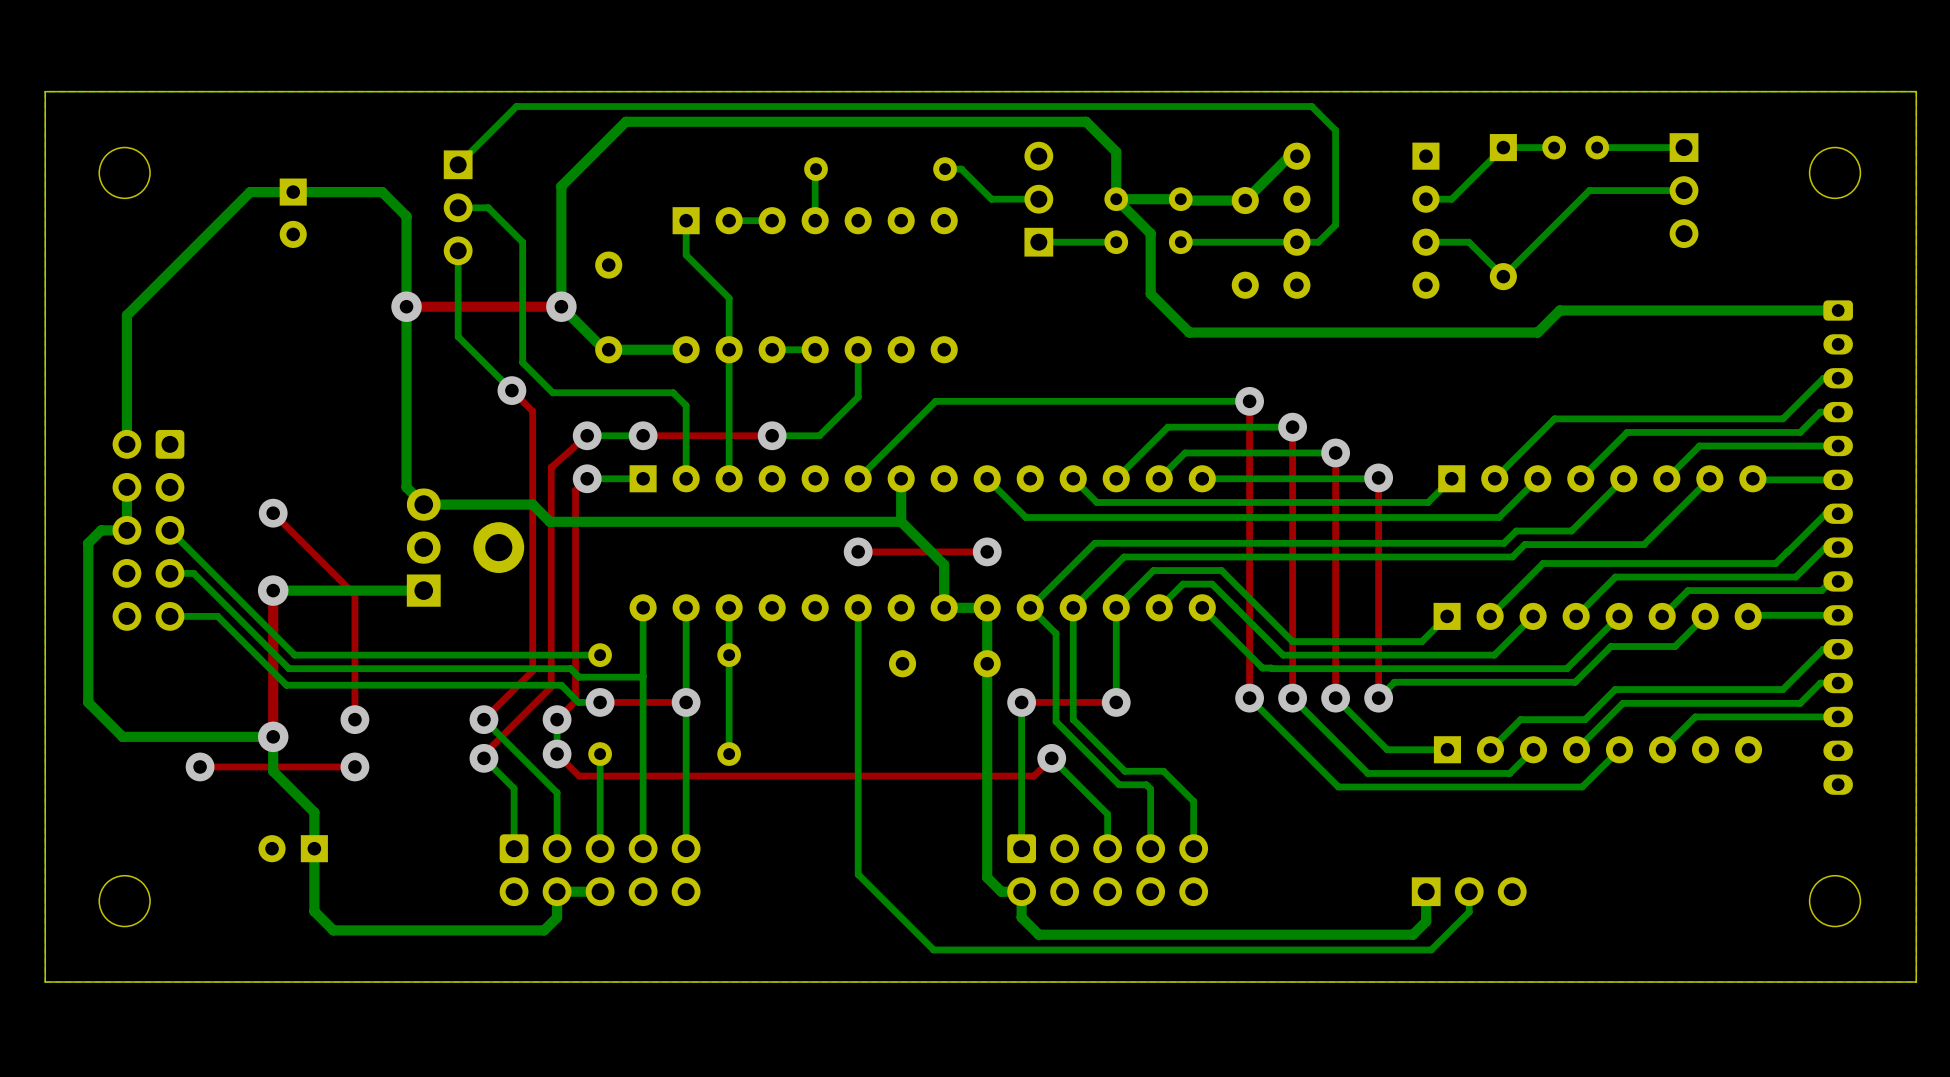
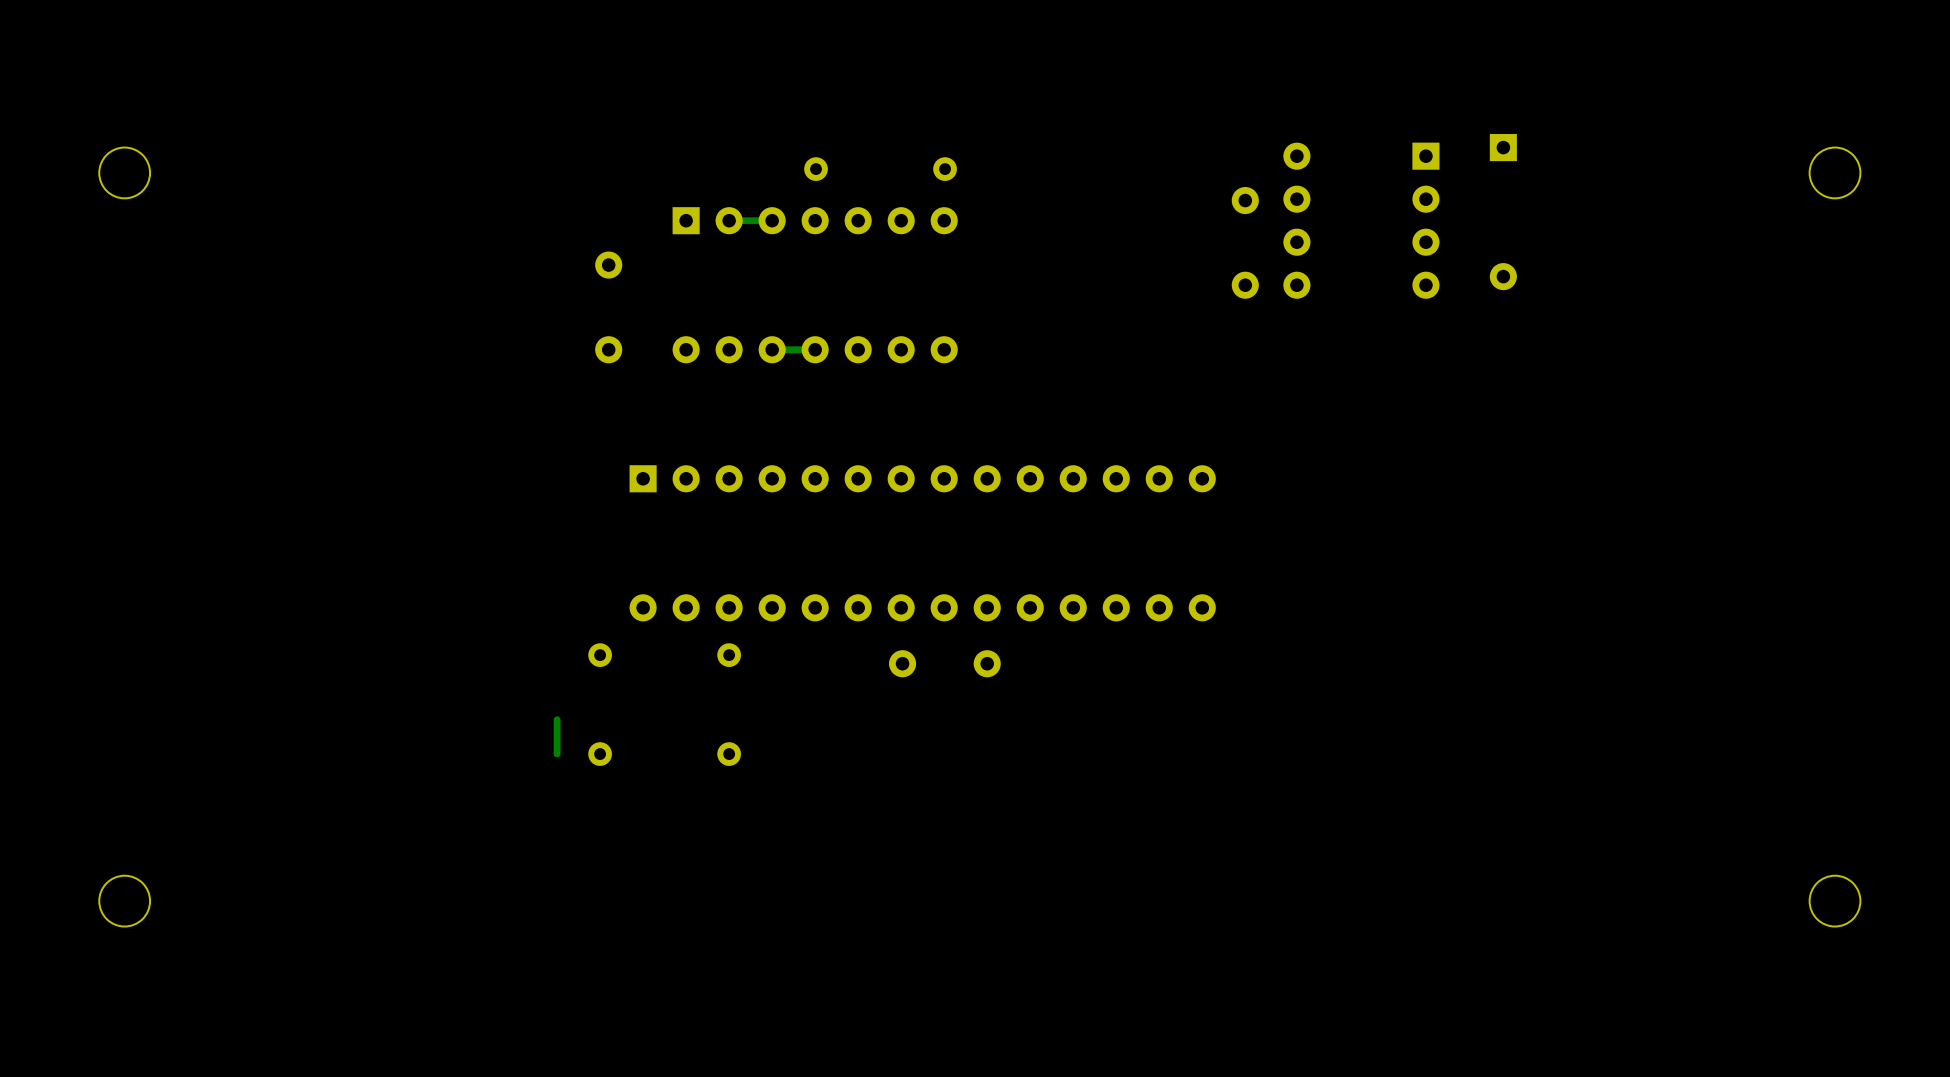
board edge: (1916, 91) (45, 91) (45, 982) (1916, 982) (1916, 91) -> none
bottom track: (1554, 147) (1503, 147) (1451, 199) (1425, 199) -> none
part: (1575, 147) -> none
bottom track: (1684, 147) (1597, 147) -> none
bottom track: (1289, 156) (1245, 200) (1182, 200) -> none
bottom track: (458, 164) (516, 106) (1311, 106) (1335, 130) (1335, 224) (1318, 242) (1180, 242) -> none
bottom track: (815, 169) (815, 220) -> none
bottom track: (945, 169) (961, 169) (991, 199) (1038, 199) -> none
bottom track: (1684, 190) (1589, 190) (1503, 276) (1468, 242) (1425, 242) -> none
part: (1684, 190) -> none
part: (1038, 199) -> none
bottom track: (1116, 199) (1116, 151) (1086, 121) (625, 121) (561, 186) (561, 306) (604, 349) -> none
bottom track: (1116, 199) (1150, 233) (1150, 293) (1189, 332) (1537, 332) (1559, 310) (1838, 310) -> none
bottom track: (1180, 199) (1116, 199) -> none
bottom track: (458, 207) (488, 207) (522, 242) (522, 362) (552, 392) (673, 392) (686, 405) (686, 478) -> none
part: (458, 207) -> none
part: (293, 213) -> none
bottom track: (686, 220) (686, 255) (729, 298) (729, 478) -> none
part: (1116, 220) -> none
part: (1180, 220) -> none
bottom track: (1116, 242) (1038, 242) -> none
bottom track: (458, 250) (458, 336) (511, 390) -> none
via: (406, 306) -> none
top track: (561, 306) (406, 306) -> none
via: (561, 306) -> none
bottom track: (686, 349) (608, 349) -> none
bottom track: (858, 349) (858, 397) (819, 435) (772, 435) -> none
bottom track: (1838, 378) (1823, 378) (1782, 418) (1554, 418) (1494, 478) -> none
top track: (511, 390) (532, 411) (532, 670) (483, 719) -> none
via: (511, 390) -> none
top track: (1249, 401) (1249, 698) -> none
bottom track: (1249, 401) (935, 401) (858, 478) -> none
via: (1249, 401) -> none
bottom track: (1838, 412) (1820, 412) (1800, 432) (1627, 432) (1580, 478) -> none
top track: (1292, 427) (1292, 698) -> none
bottom track: (1292, 427) (1167, 427) (1116, 478) -> none
via: (1292, 427) -> none
top track: (587, 435) (551, 467) (551, 687) (483, 754) (483, 758) -> none
via: (587, 435) -> none
bottom track: (643, 435) (587, 435) -> none
via: (643, 435) -> none
top track: (772, 435) (643, 435) -> none
via: (772, 435) -> none
bottom track: (126, 444) (126, 315) (250, 192) (382, 192) (406, 216) (406, 487) (423, 504) (532, 504) (549, 521) (901, 521) -> none
bottom track: (1838, 445) (1699, 445) (1666, 478) -> none
top track: (1335, 452) (1335, 698) -> none
bottom track: (1335, 452) (1185, 452) (1159, 478) -> none
via: (1335, 452) -> none
top track: (1378, 477) (1378, 698) -> none
bottom track: (1378, 477) (1202, 478) -> none
via: (1378, 477) -> none
top track: (587, 478) (575, 490) (575, 701) (557, 719) -> none
via: (587, 478) -> none
bottom track: (643, 478) (587, 478) -> none
bottom track: (901, 478) (901, 521) -> none
bottom track: (1451, 478) (1428, 502) (1096, 502) (1073, 478) -> none
bottom track: (1537, 478) (1499, 517) (1025, 517) (987, 478) -> none
part: (1602, 478) -> none
bottom track: (1623, 478) (1571, 531) (1516, 531) (1504, 543) (1094, 543) (1030, 607) (1056, 633) (1056, 721) (1119, 784) (1146, 784) (1150, 789) (1150, 848) -> none
bottom track: (1709, 478) (1644, 544) (1524, 544) (1512, 557) (1124, 557) (1073, 607) (1073, 719) (1124, 771) (1163, 771) (1193, 801) (1193, 848) -> none
bottom track: (1838, 479) (1753, 479) -> none
bottom track: (126, 487) (126, 530) (101, 530) (88, 543) (88, 702) (122, 736) (273, 736) (273, 771) (314, 812) (314, 911) (333, 930) (544, 930) (557, 917) (557, 891) (600, 891) -> none
top track: (273, 513) (354, 594) (354, 719) -> none
via: (273, 513) -> none
bottom track: (1838, 513) (1825, 513) (1775, 563) (1543, 563) (1490, 616) -> none
bottom track: (901, 521) (944, 564) (944, 607) (987, 607) (987, 877) (1001, 891) (1021, 891) (1021, 917) (1038, 934) (1413, 934) (1426, 921) (1426, 891) -> none
part: (148, 530) -> none
bottom track: (169, 530) (294, 655) (600, 655) -> none
part: (423, 547) -> none
part: (498, 547) -> none
bottom track: (1838, 547) (1825, 547) (1795, 577) (1615, 577) (1576, 616) -> none
part: (1838, 547) -> none
via: (858, 551) -> none
top track: (987, 551) (858, 551) -> none
via: (987, 551) -> none
bottom track: (169, 573) (193, 573) (289, 668) (570, 668) (579, 677) (643, 676) -> none
bottom track: (1830, 581) (1821, 590) (1687, 590) (1662, 616) -> none
top track: (273, 590) (273, 732) -> none
via: (273, 590) -> none
bottom track: (423, 590) (273, 590) (275, 593) -> none
bottom track: (643, 607) (643, 848) -> none
bottom track: (686, 607) (686, 848) -> none
bottom track: (729, 607) (729, 754) -> none
bottom track: (858, 607) (858, 874) (933, 949) (1431, 949) (1469, 912) (1469, 891) -> none
bottom track: (1159, 607) (1182, 584) (1212, 584) (1283, 655) (1494, 655) (1533, 616) -> none
bottom track: (1202, 607) (1262, 668) (1271, 668) (1566, 668) (1619, 616) -> none
bottom track: (1838, 615) (1749, 615) -> none
bottom track: (169, 616) (217, 616) (286, 685) (561, 685) (578, 702) (600, 702) -> none
bottom track: (1447, 616) (1421, 641) (1292, 641) (1221, 570) (1153, 570) (1116, 607) (1116, 702) -> none
part: (1597, 616) -> none
bottom track: (1705, 616) (1675, 646) (1610, 646) (1575, 682) (1394, 682) (1378, 698) -> none
bottom track: (1838, 649) (1823, 649) (1782, 689) (1615, 689) (1585, 719) (1520, 719) (1490, 749) -> none
bottom track: (1838, 683) (1820, 683) (1800, 703) (1622, 703) (1576, 749) -> none
bottom track: (1249, 698) (1338, 787) (1582, 787) (1619, 749) -> none
via: (1249, 698) -> none
bottom track: (1292, 698) (1367, 773) (1509, 773) (1533, 749) -> none
via: (1292, 698) -> none
bottom track: (1335, 698) (1387, 749) (1447, 749) -> none
via: (1335, 698) -> none
via: (1378, 698) -> none
via: (600, 702) -> none
top track: (686, 702) (600, 702) -> none
via: (686, 702) -> none
bottom track: (1021, 702) (1021, 848) -> none
via: (1021, 702) -> none
top track: (1116, 702) (1021, 702) -> none
via: (1116, 702) -> none
bottom track: (1838, 716) (1695, 716) (1662, 749) -> none
via: (354, 719) -> none
bottom track: (483, 719) (557, 792) (557, 848) -> none
via: (483, 719) -> none
via: (557, 719) -> none
via: (273, 736) -> none
part: (1598, 749) -> none
top track: (557, 754) (579, 776) (1034, 776) (1051, 758) -> none
via: (557, 754) -> none
bottom track: (600, 754) (600, 848) -> none
bottom track: (483, 758) (514, 788) (514, 848) -> none
via: (483, 758) -> none
bottom track: (1051, 758) (1107, 814) (1107, 848) -> none
via: (1051, 758) -> none
via: (200, 766) -> none
top track: (354, 766) (200, 766) -> none
via: (354, 766) -> none
part: (293, 848) -> none
part: (600, 870) -> none
part: (1107, 870) -> none
part: (1469, 891) -> none

